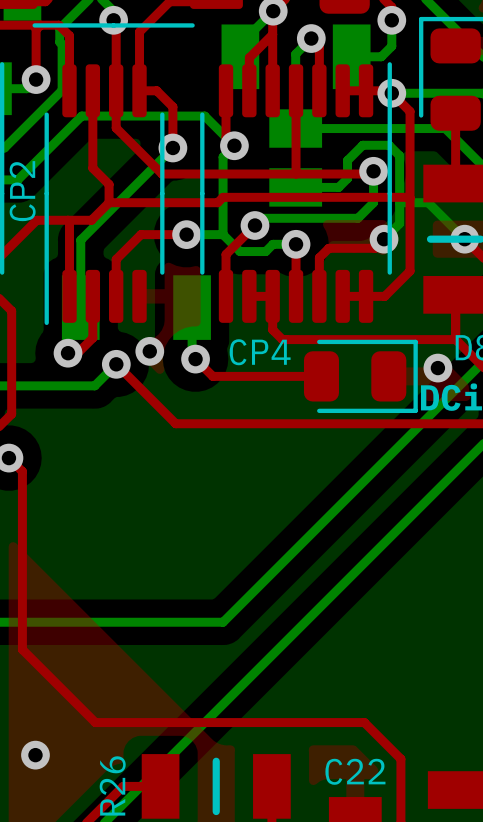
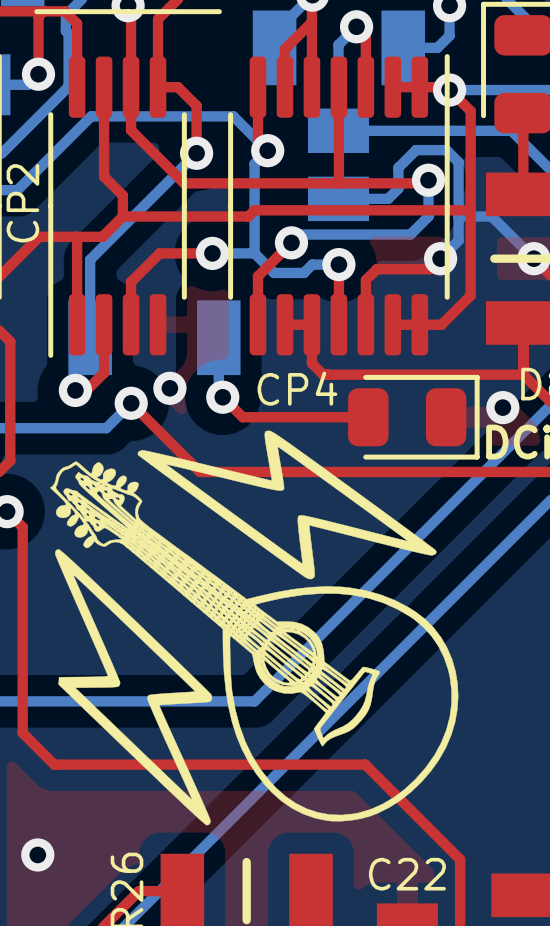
drawing: none -> [50, 430, 459, 826]
top track: (49, 676) (95, 722) (364, 722) -> (54, 764) (365, 764) (417, 817)

